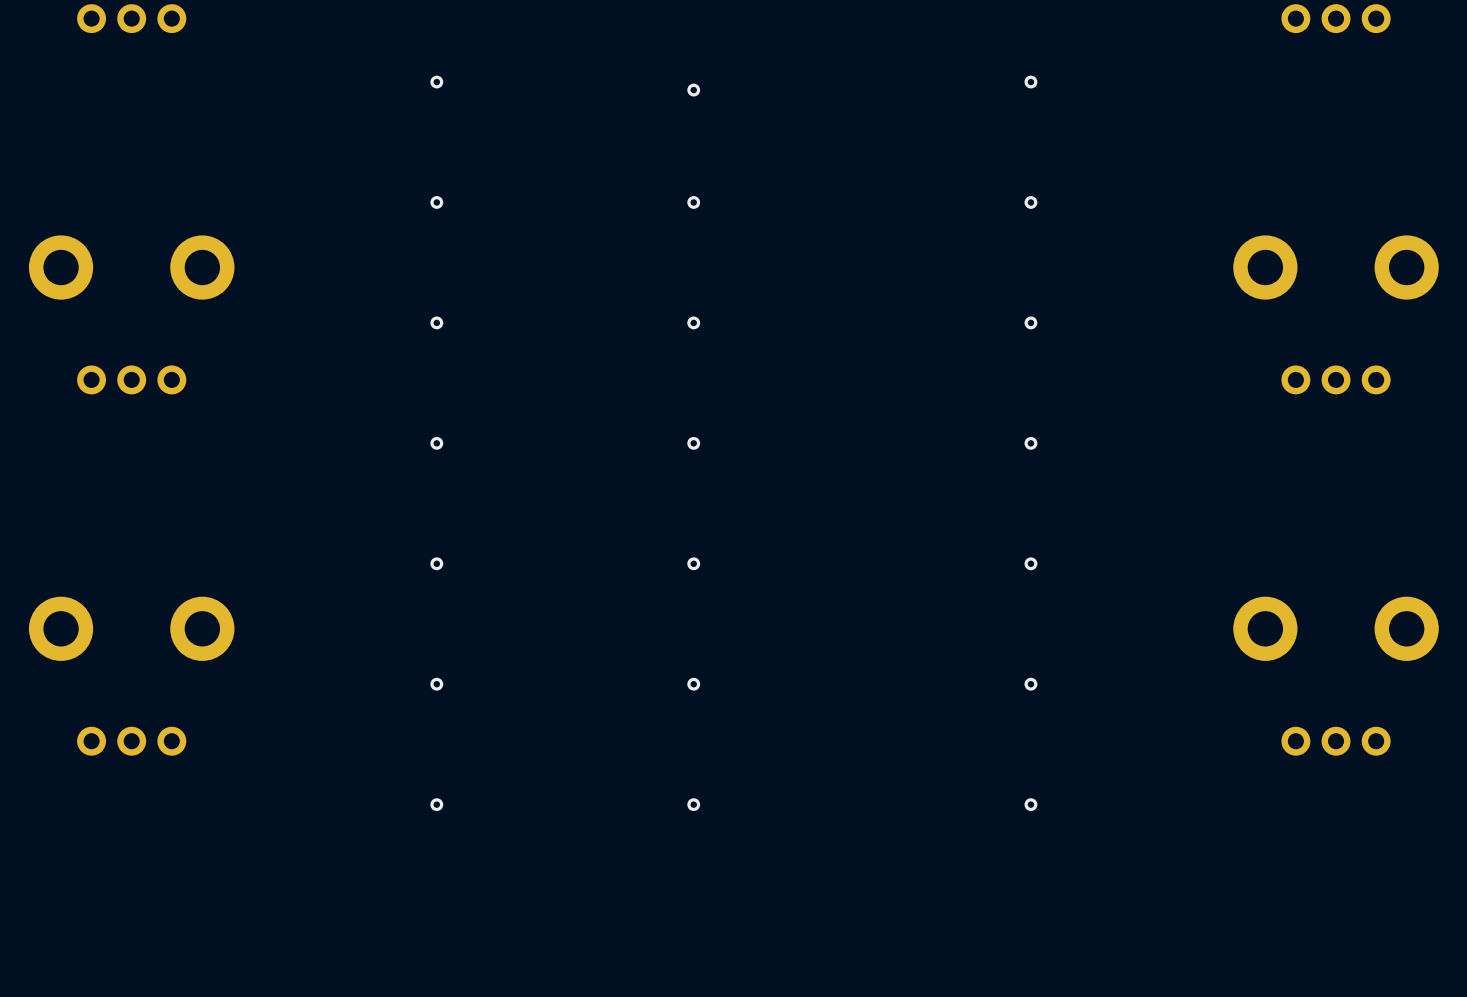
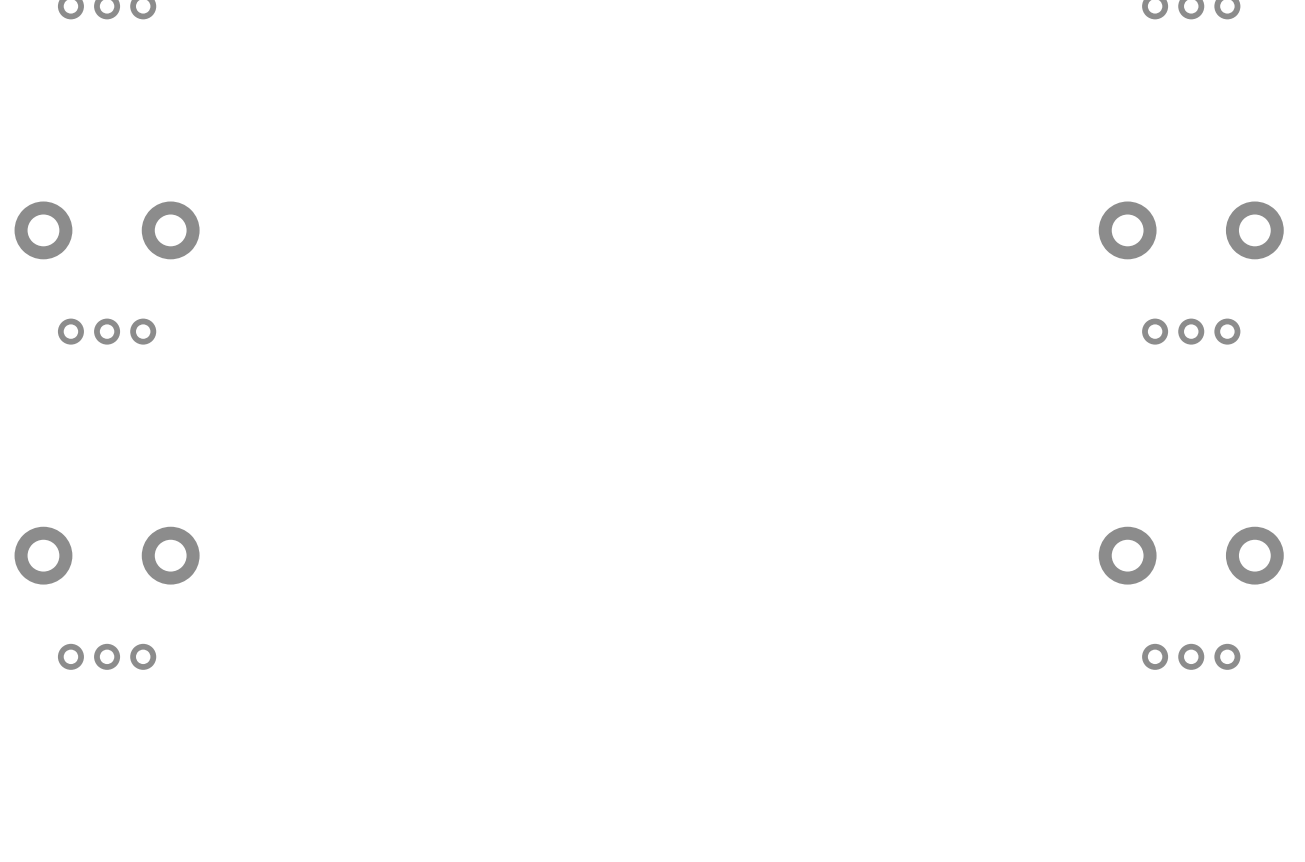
via: (436, 82) -> none
via: (1030, 82) -> none
via: (693, 90) -> none
via: (436, 202) -> none
via: (693, 202) -> none
via: (1030, 202) -> none
via: (436, 322) -> none
via: (693, 322) -> none
via: (1030, 322) -> none
via: (436, 443) -> none
via: (693, 443) -> none
via: (1030, 443) -> none
via: (436, 563) -> none
via: (693, 563) -> none
via: (1030, 563) -> none
via: (436, 684) -> none
via: (693, 684) -> none
via: (1030, 684) -> none
via: (436, 804) -> none
via: (693, 804) -> none
via: (1030, 804) -> none

